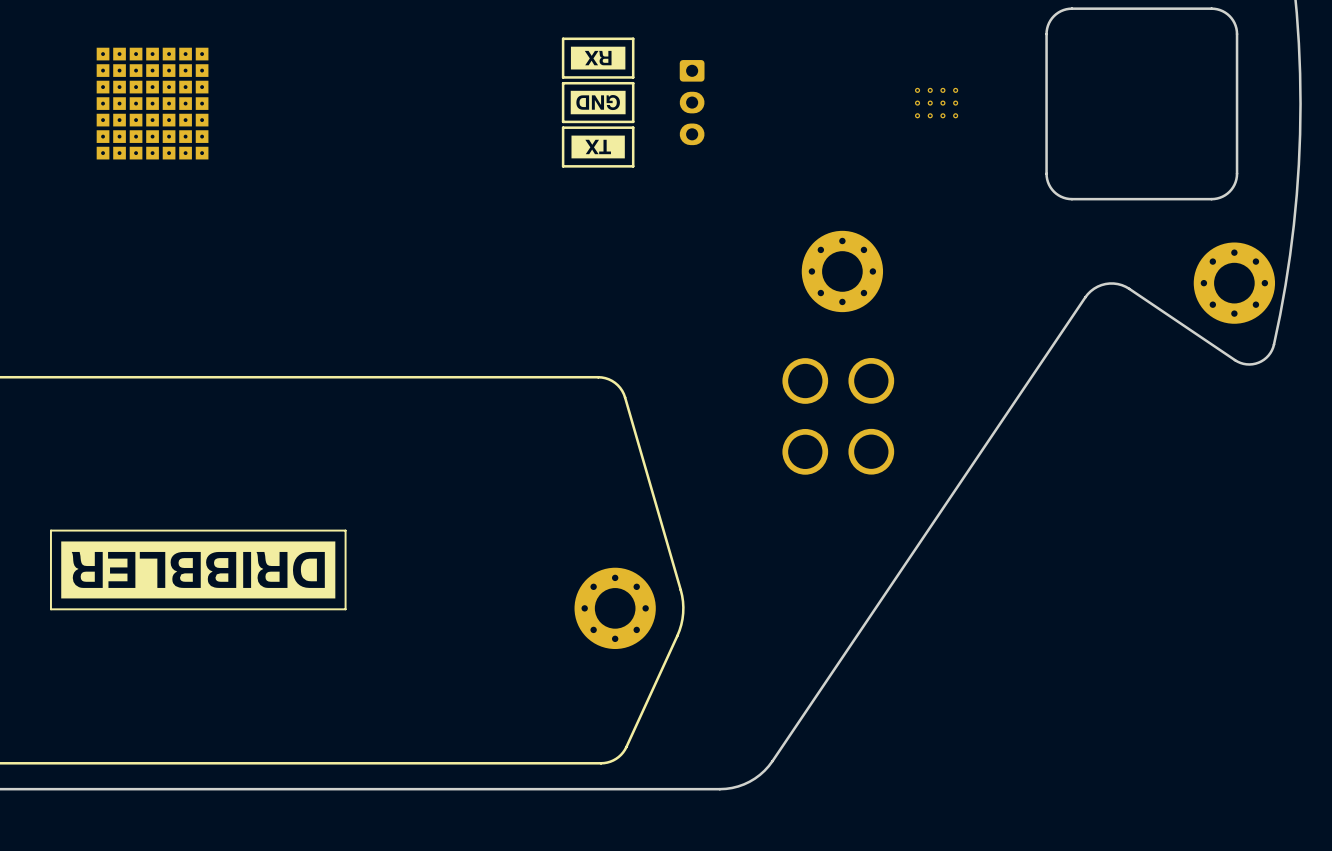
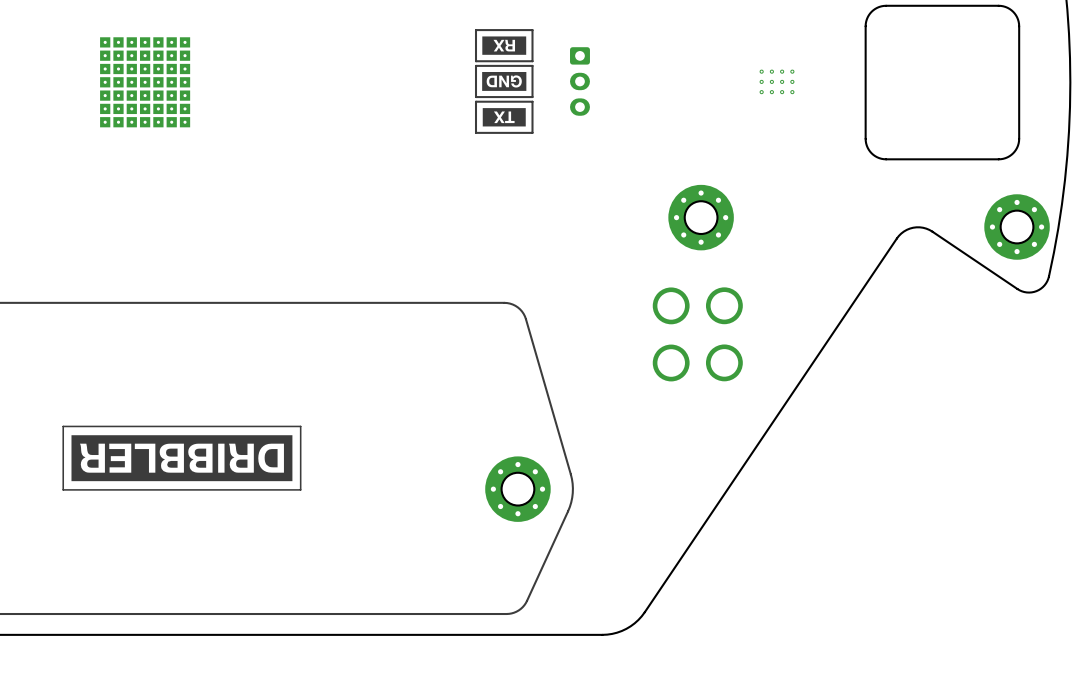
round board edge: none -> [683, 200, 719, 236]
round board edge: none -> [999, 209, 1035, 245]
round board edge: none -> [500, 471, 536, 507]

